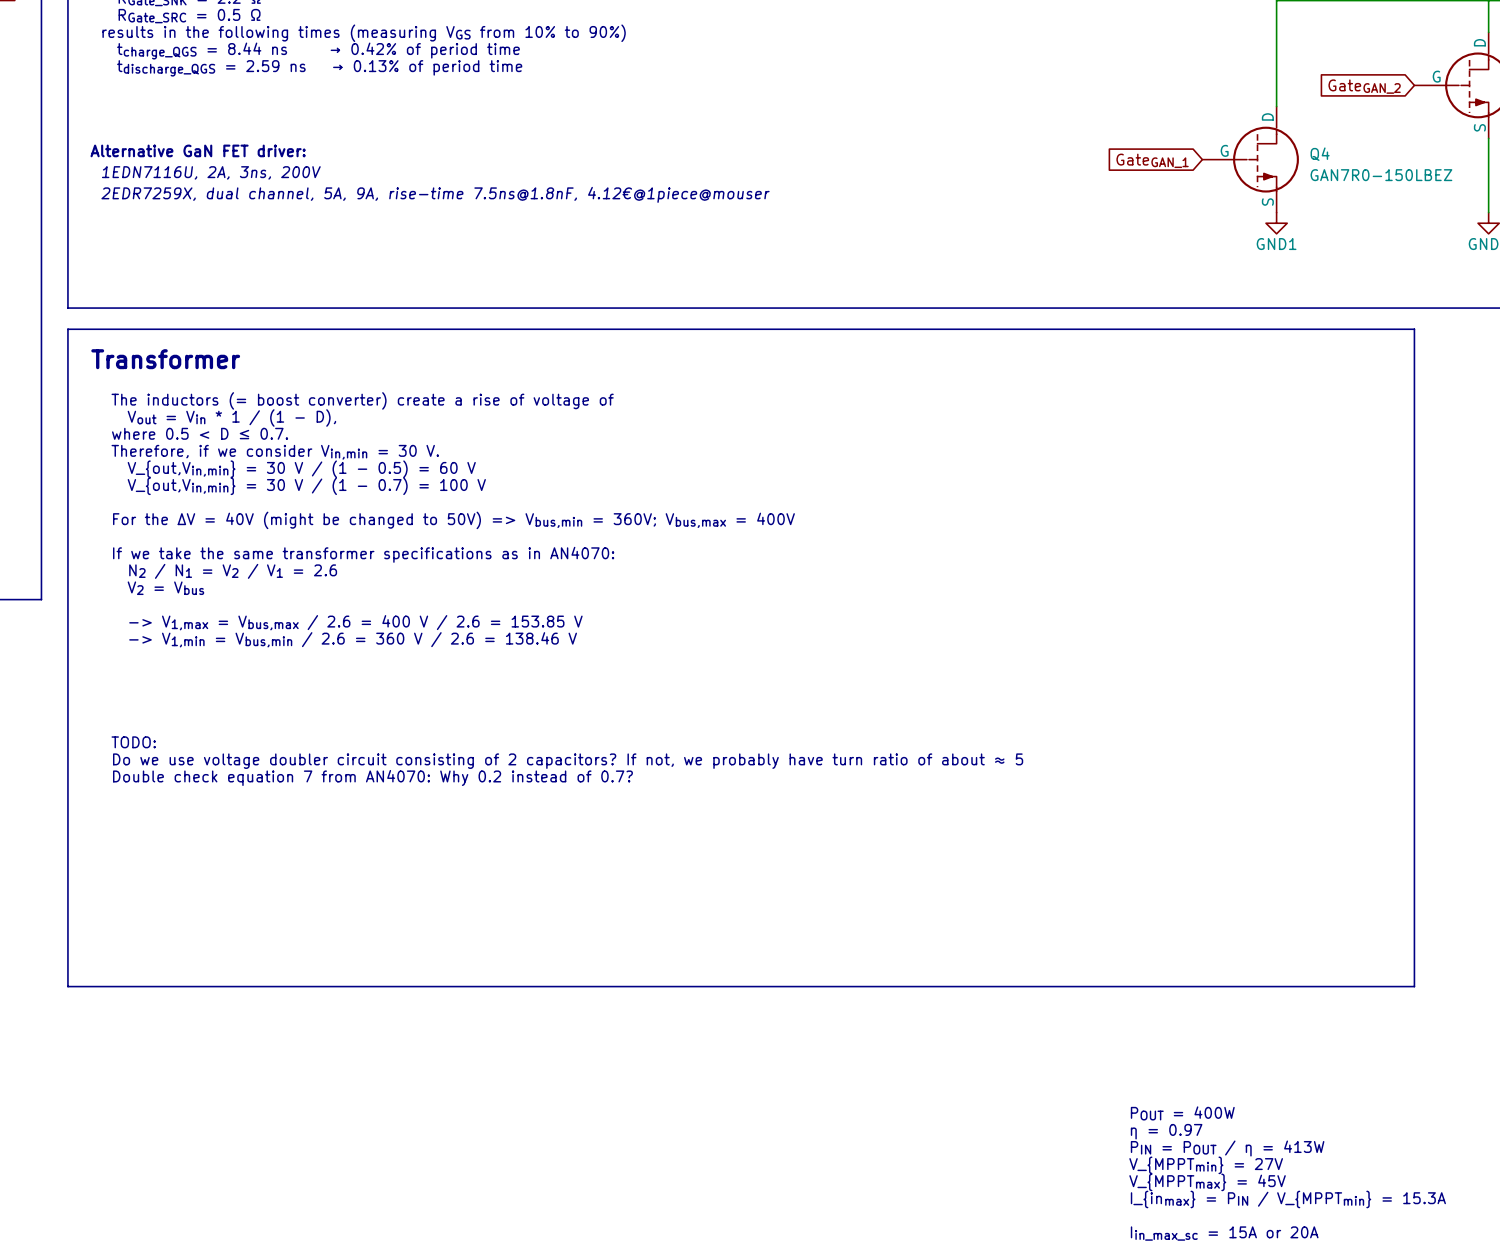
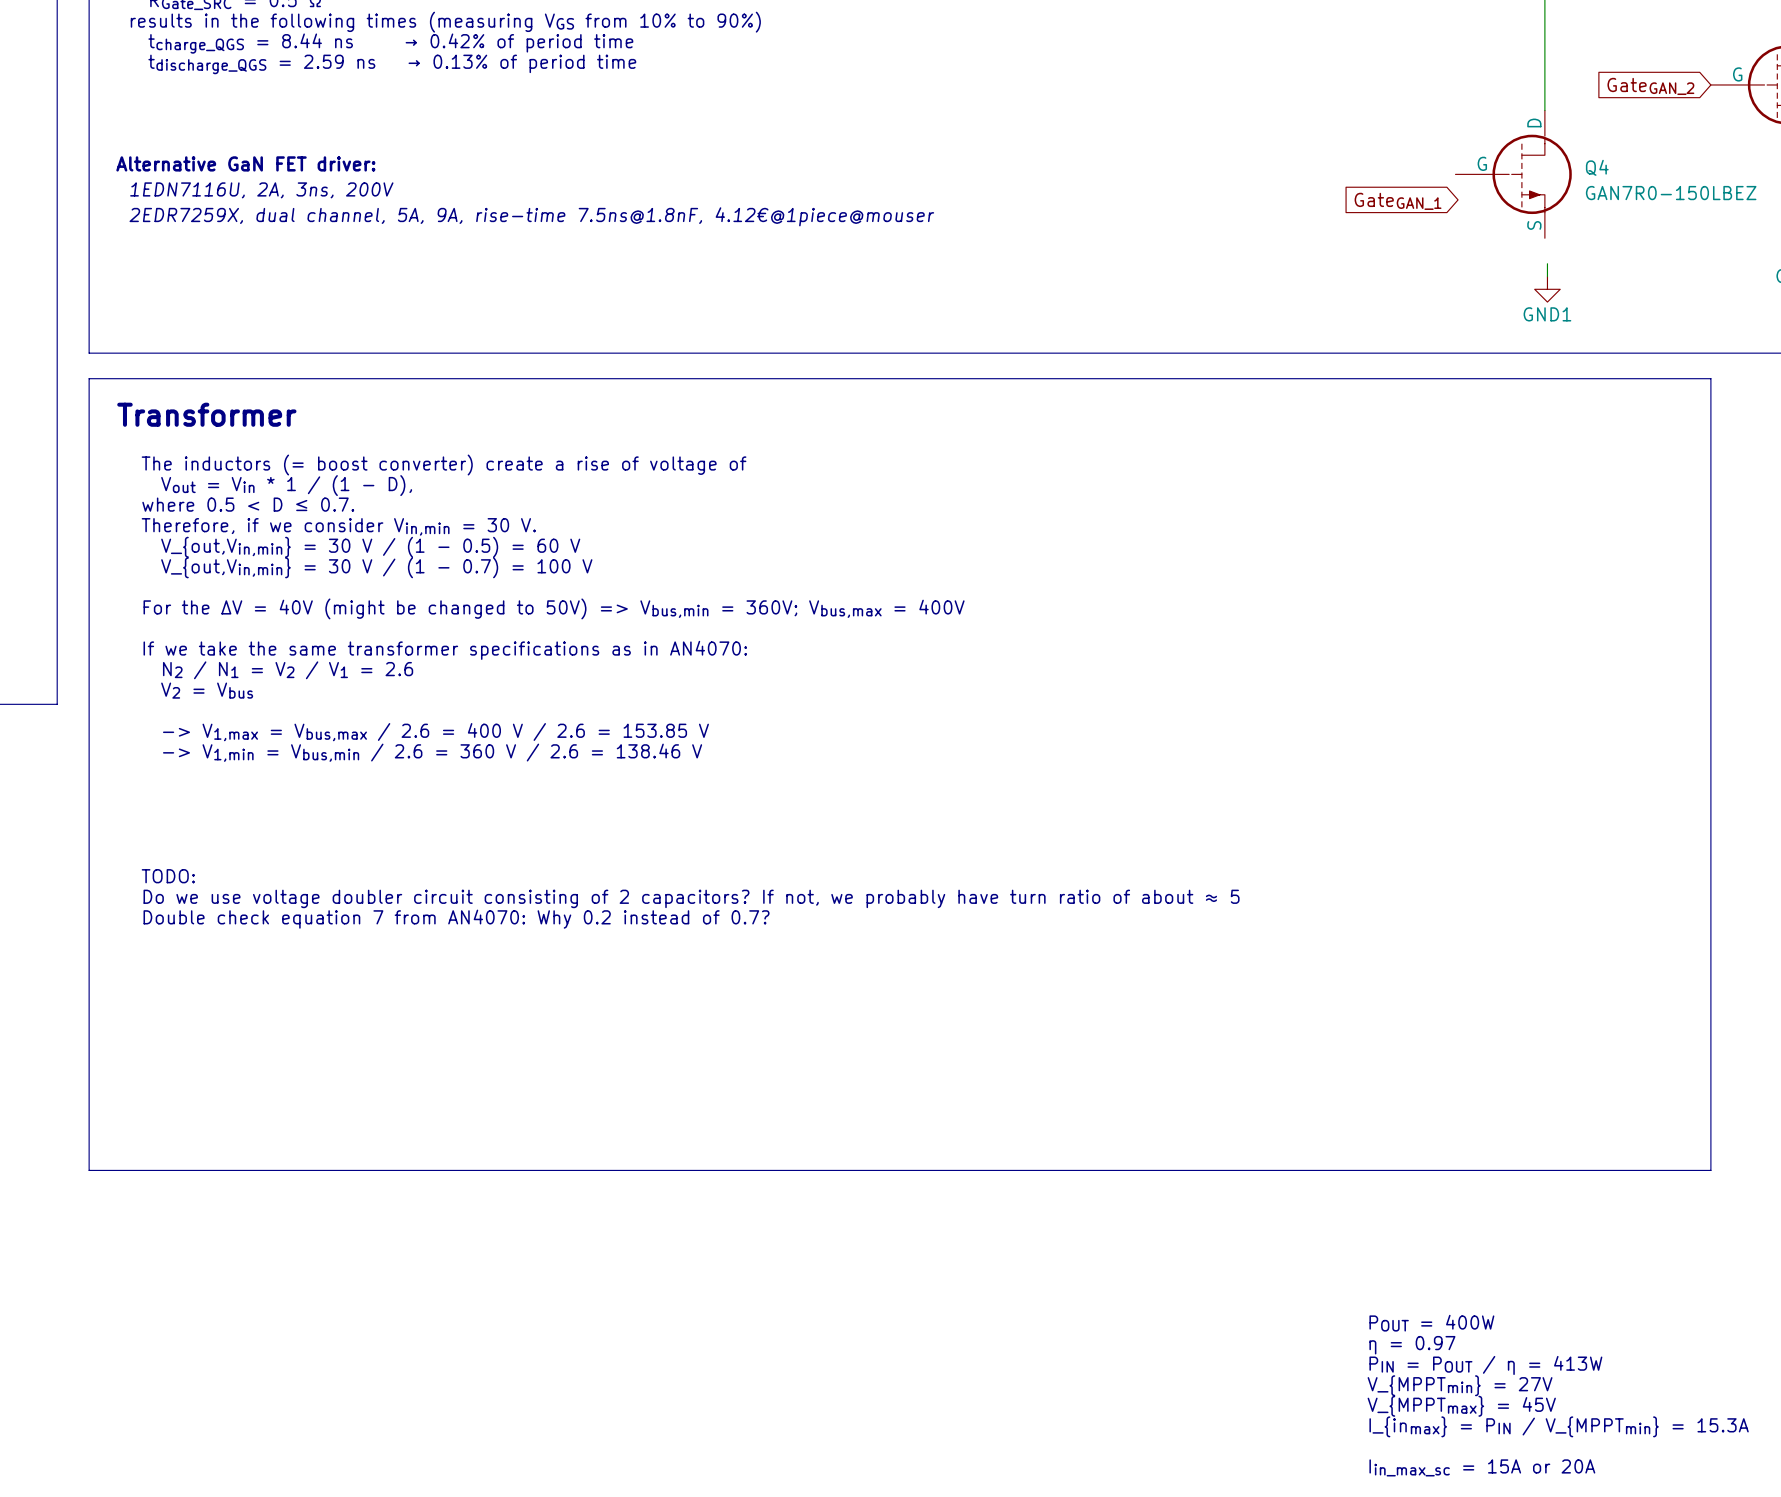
global label position: GateGAN_1 (1152, 160) -> GateGAN_1 (1398, 201)
power symbol position: GND1 (1276, 223) -> GND1 (1547, 289)
wire: none -> (1547, 263) (1547, 276)

